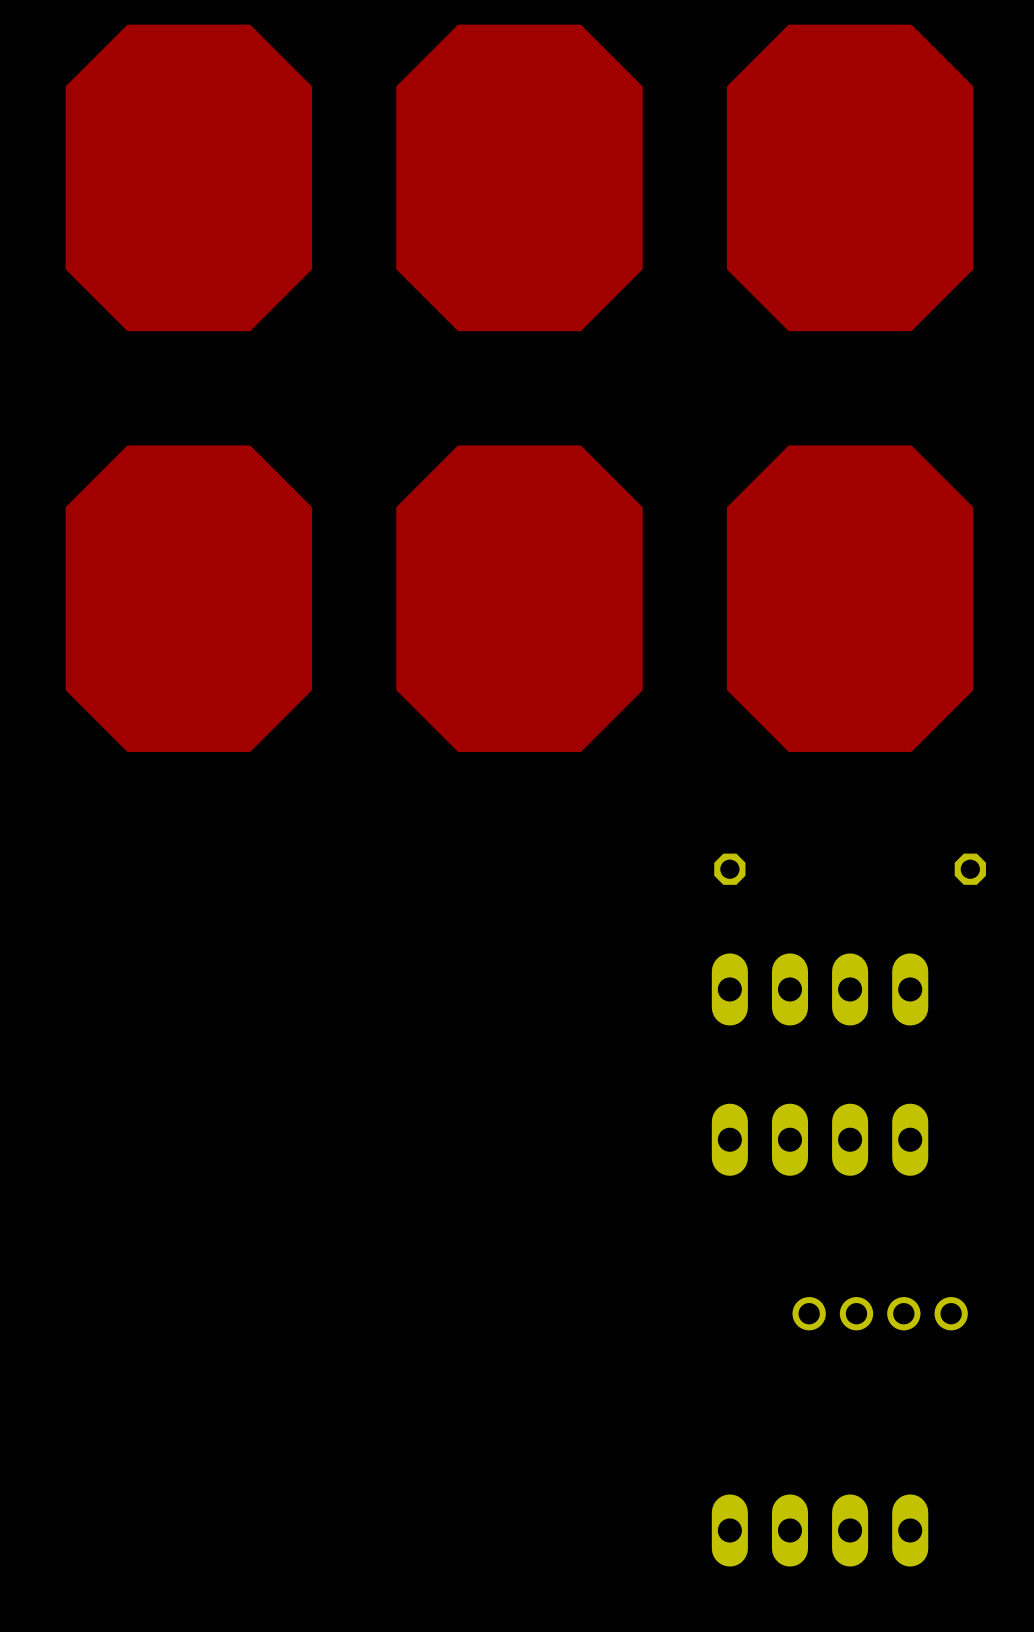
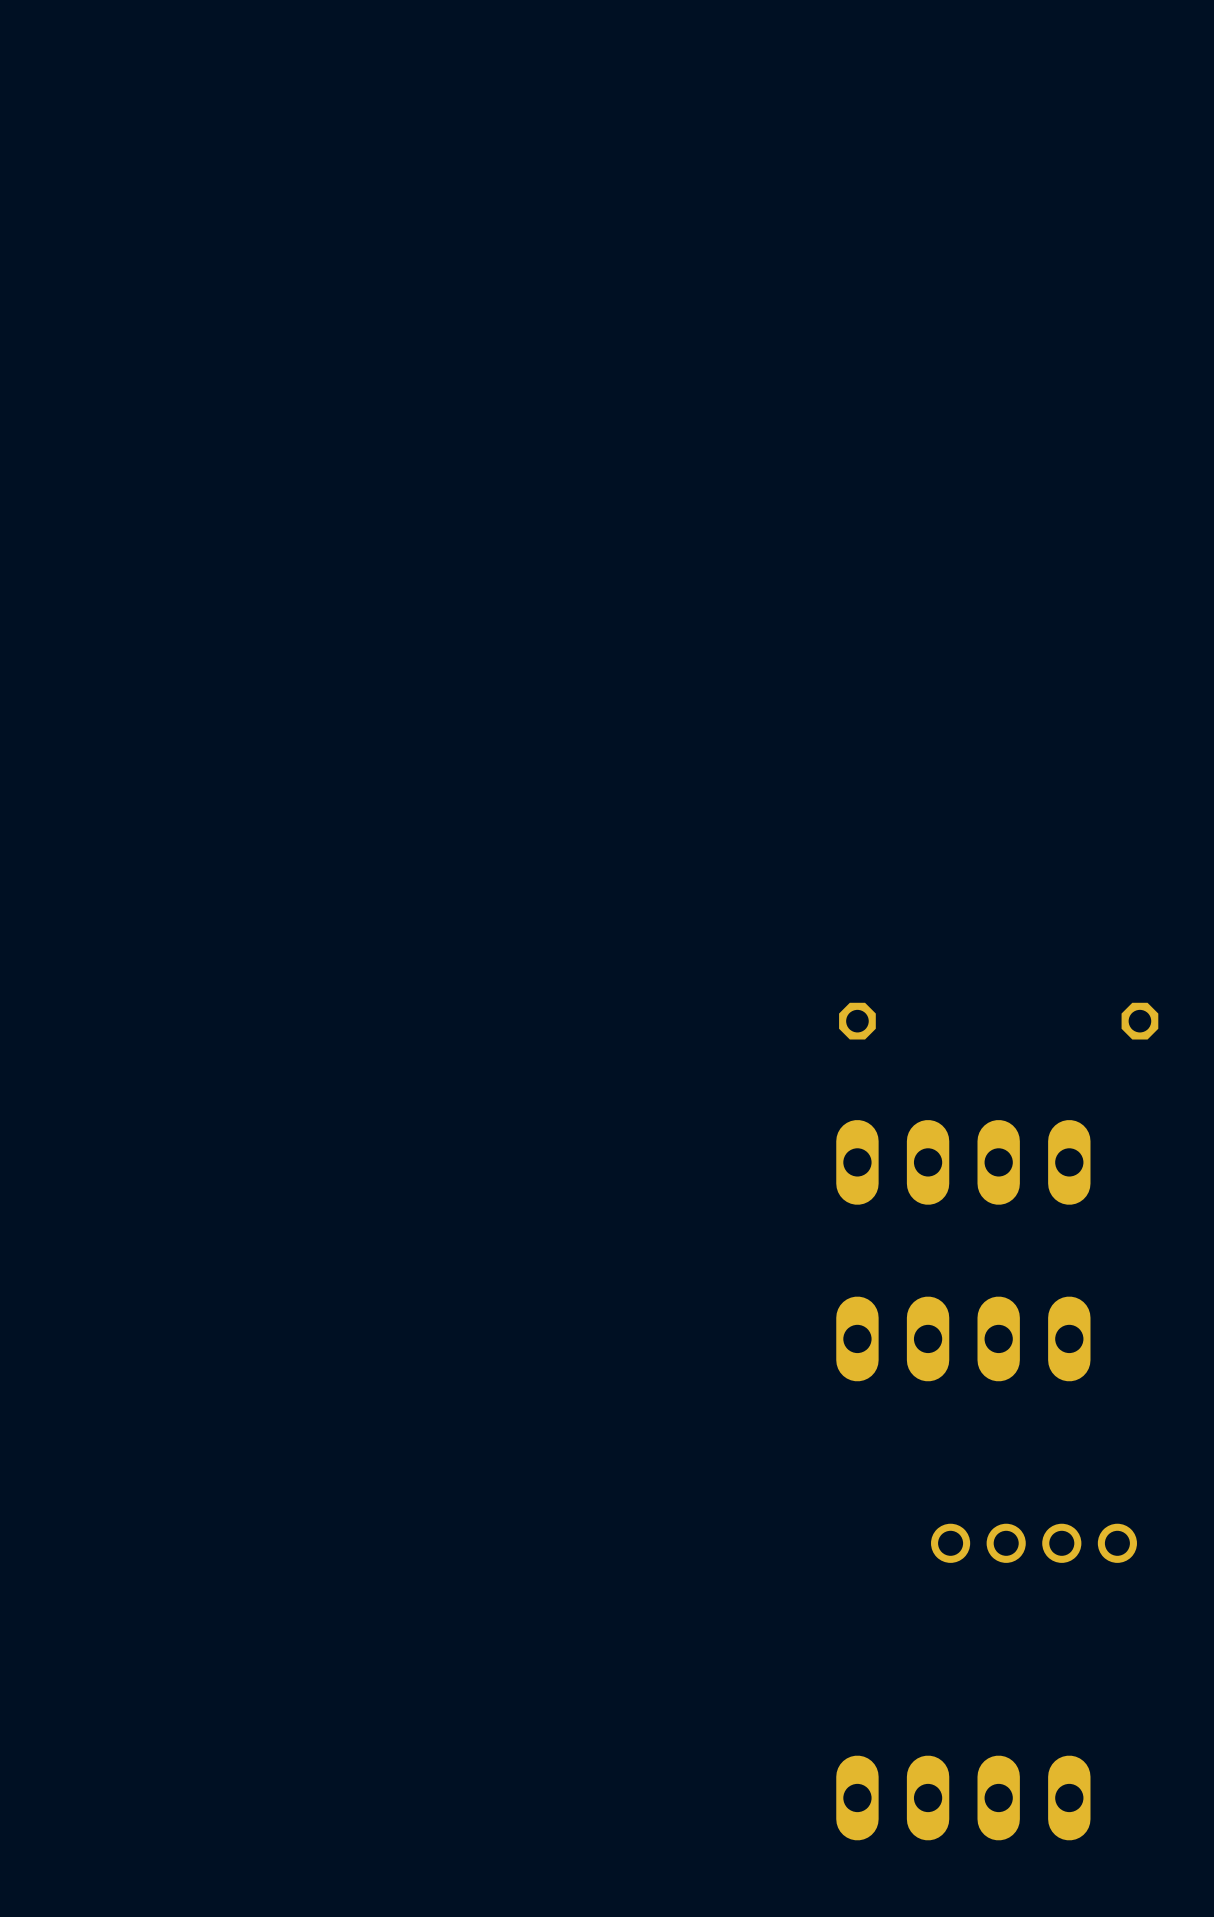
part: (188, 177) -> none
part: (519, 177) -> none
part: (850, 177) -> none
part: (188, 598) -> none
part: (519, 598) -> none
part: (850, 598) -> none

